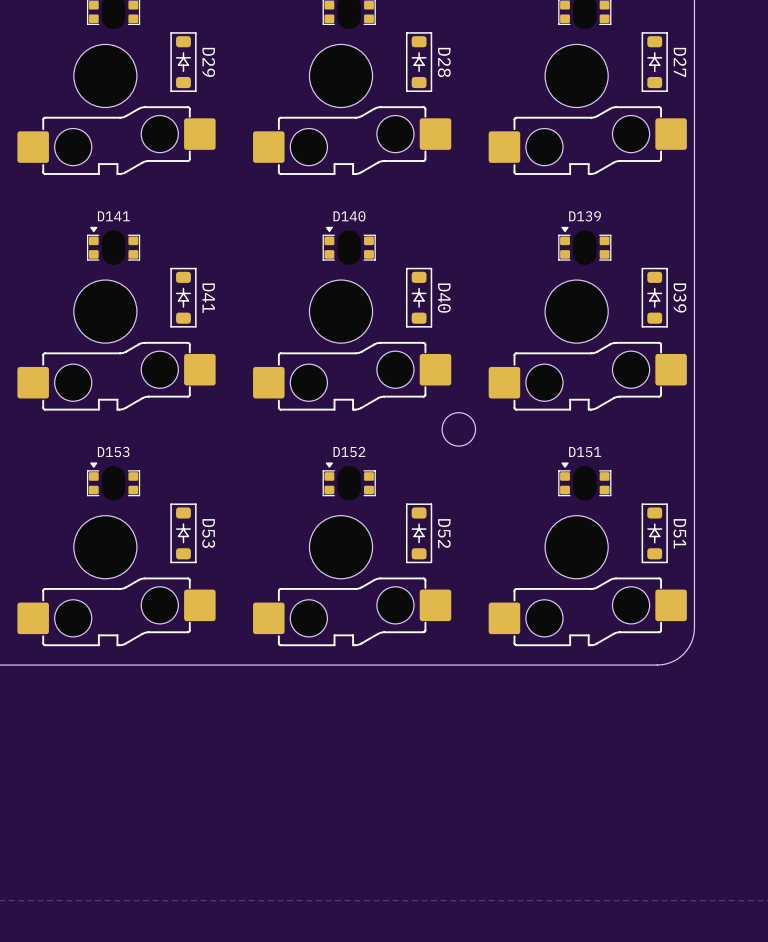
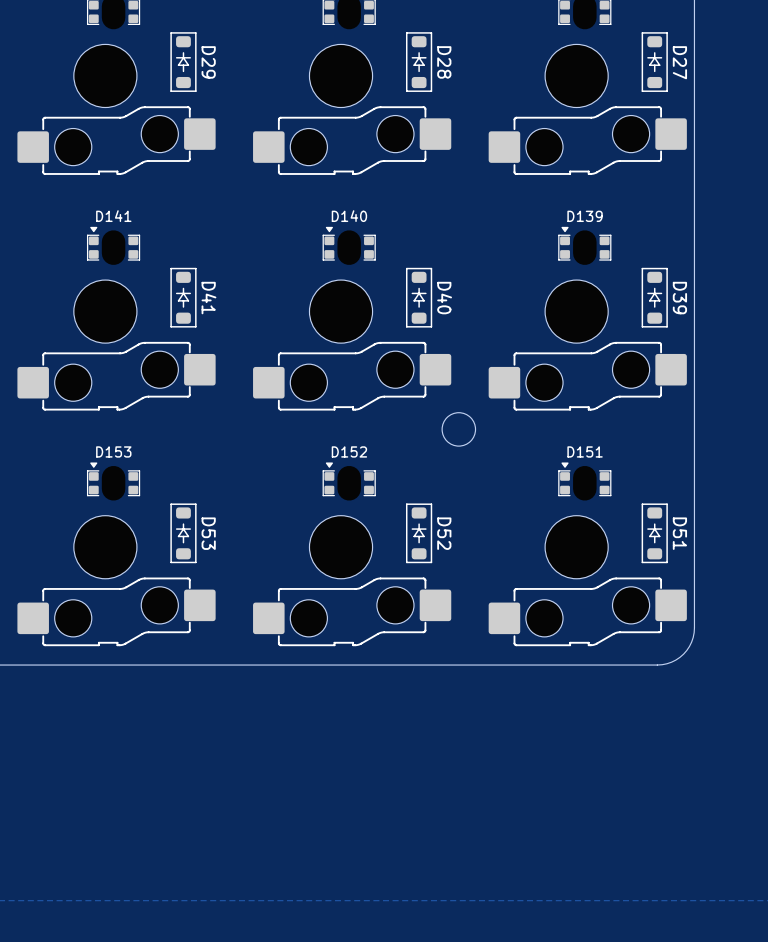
part footprint: [17, 44, 216, 175] -> [17, 44, 216, 175]
part footprint: [253, 44, 452, 175] -> [253, 44, 452, 175]
part footprint: [488, 44, 687, 175] -> [488, 44, 687, 175]
part footprint: [17, 280, 216, 411] -> [17, 280, 216, 411]
part footprint: [253, 280, 452, 411] -> [253, 280, 452, 411]
part footprint: [488, 280, 687, 411] -> [488, 280, 687, 411]
part footprint: [17, 515, 216, 647] -> [17, 515, 216, 647]
part footprint: [253, 515, 452, 647] -> [253, 515, 452, 647]
part footprint: [488, 515, 687, 647] -> [488, 515, 687, 647]

